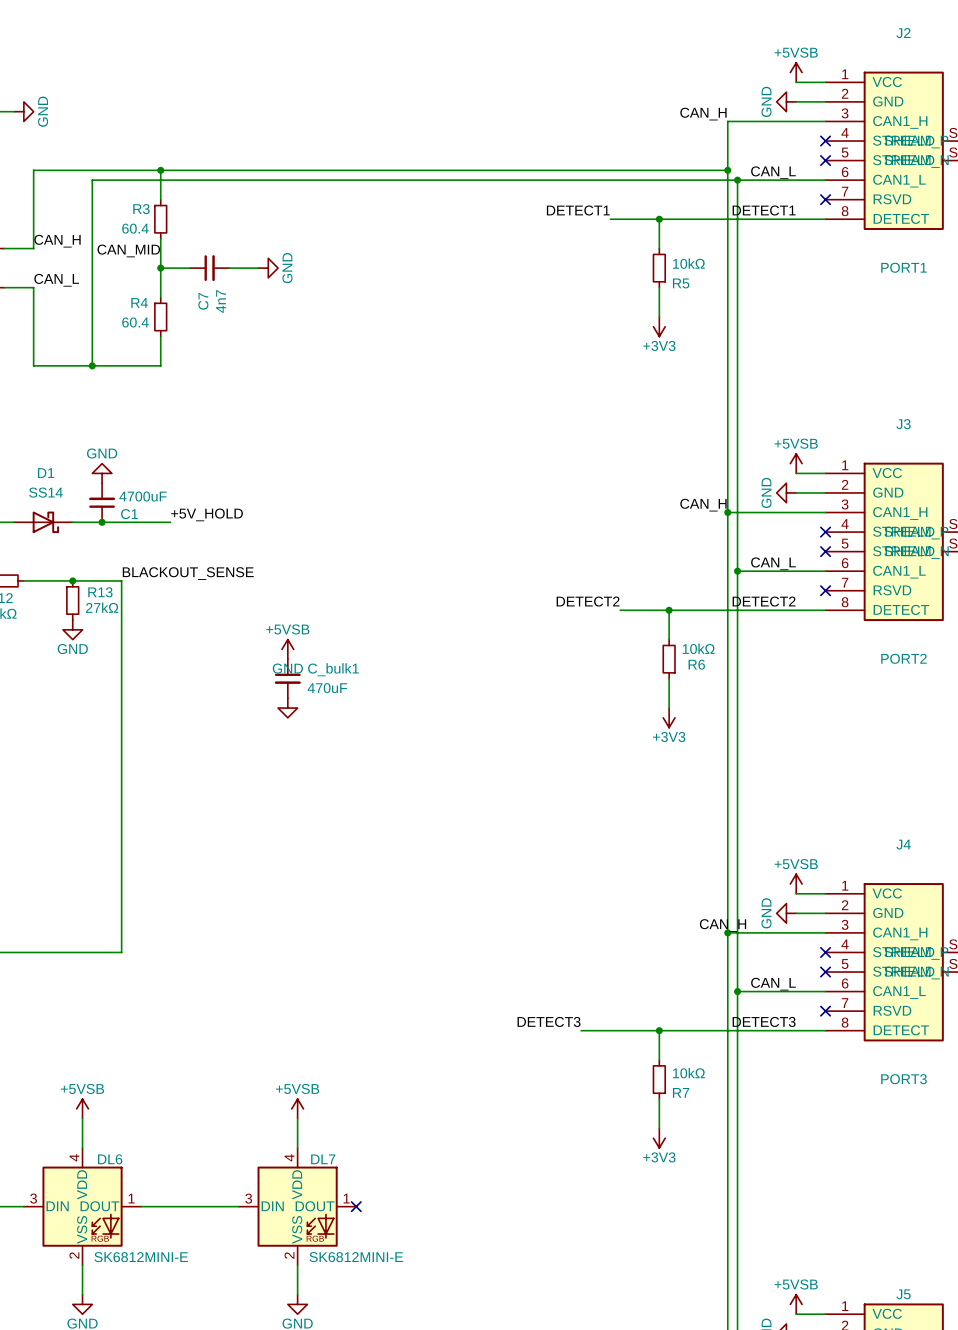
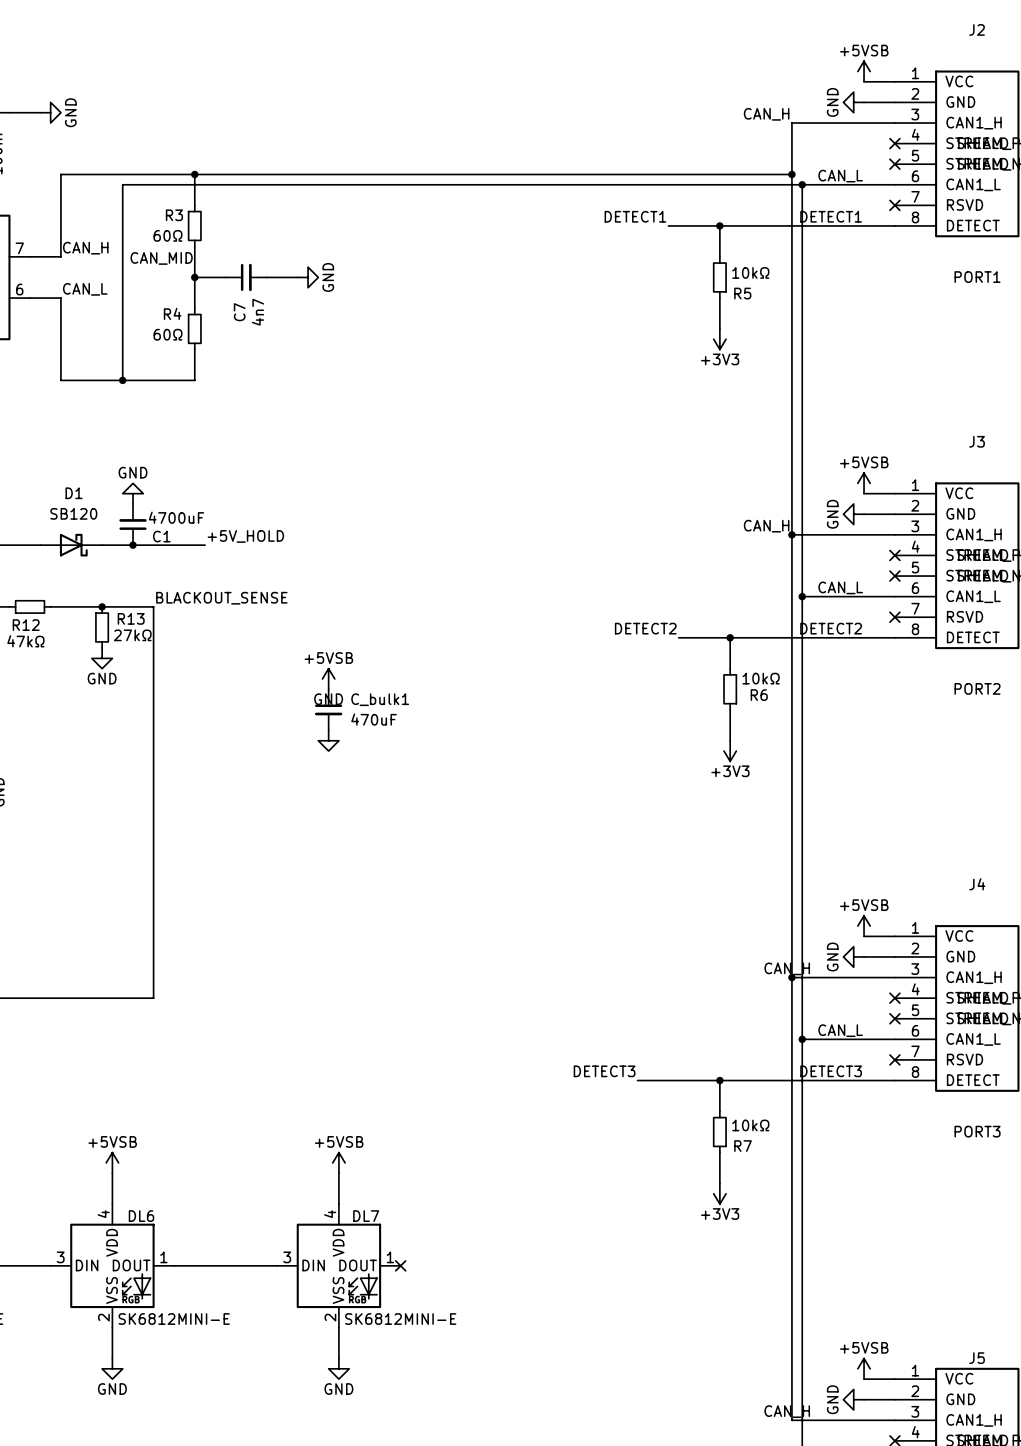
R3 value: 60.4 (135, 228) -> 60Ω (168, 235)
R4 value: 60.4 (135, 322) -> 60Ω (168, 334)
D1 value: SS14 (45, 492) -> SB120 (73, 513)

